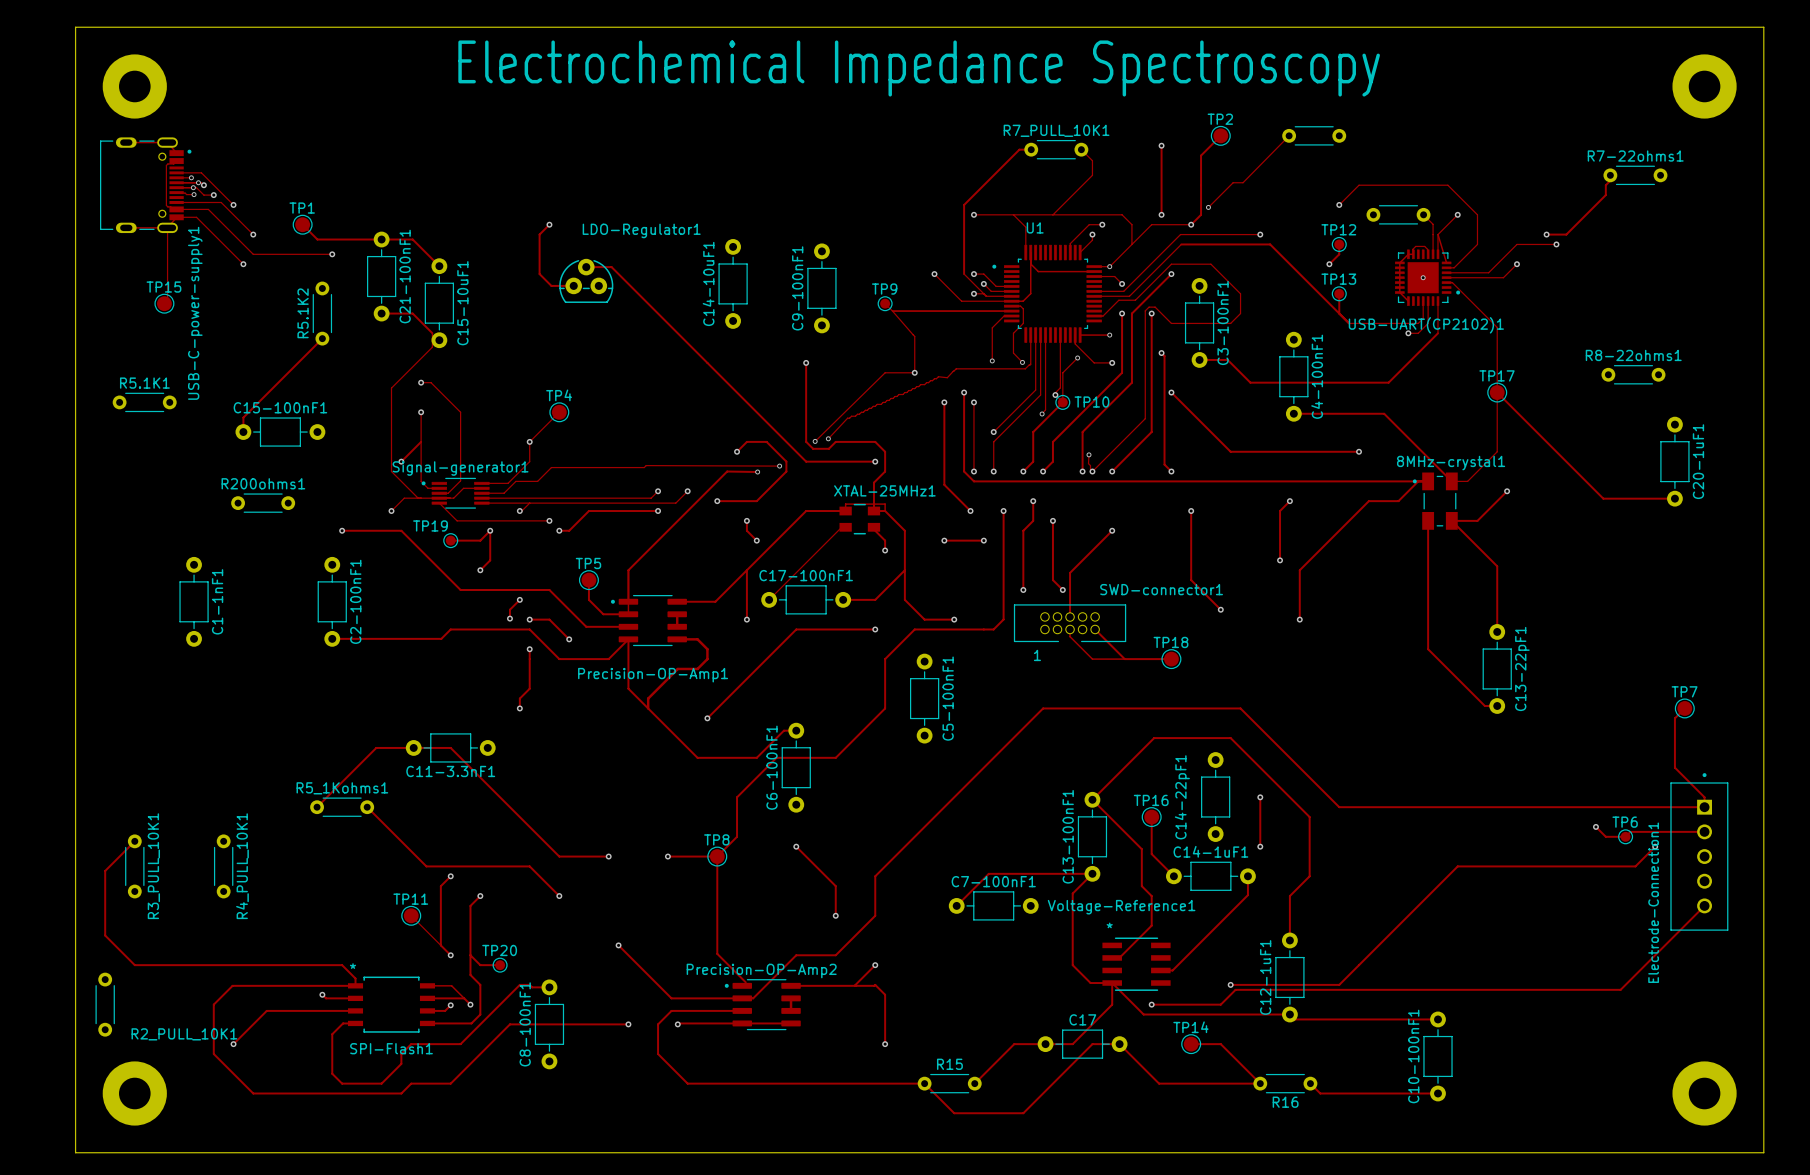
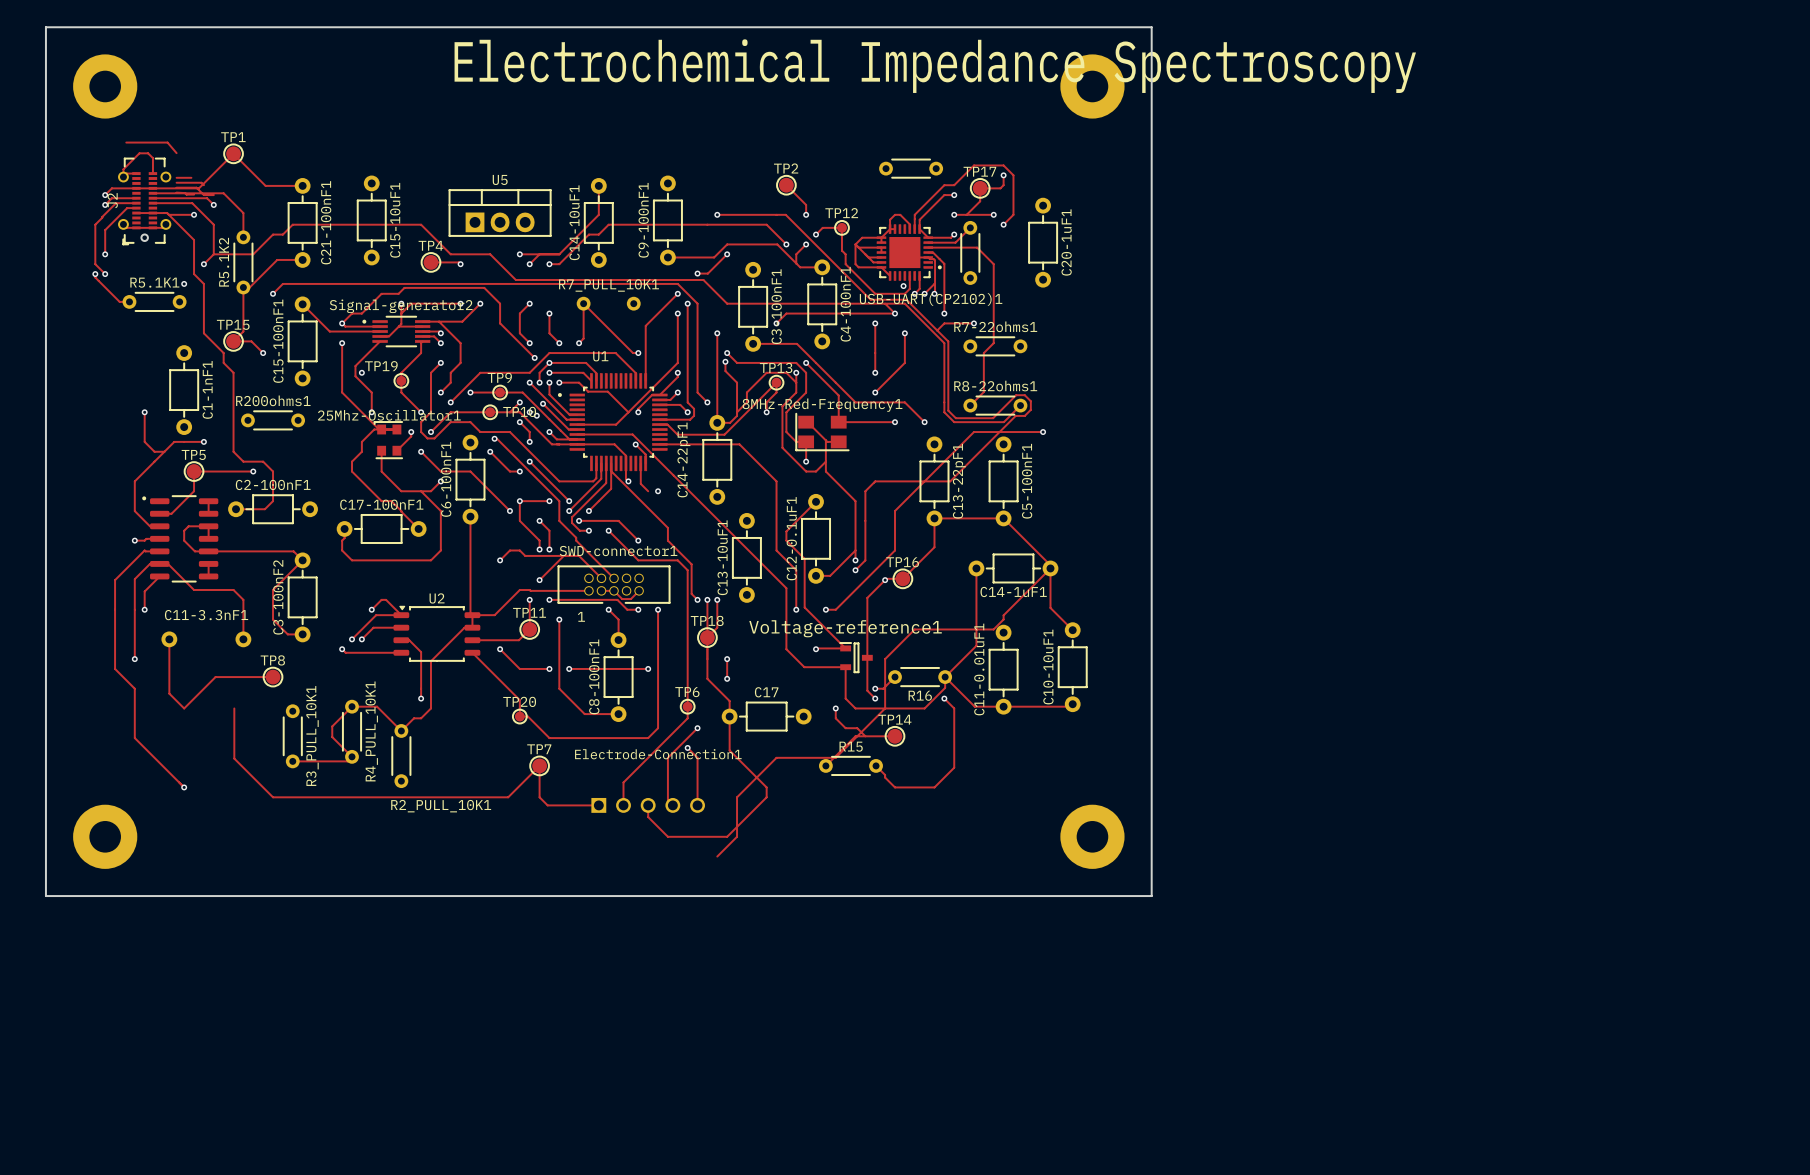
board edge: (75, 27) (75, 1152) (1763, 1152) (1763, 27) (1151, 27) -> (75, 27) (45, 27) (45, 896) (1151, 896) (1151, 27)
part position: (134, 86) -> (105, 86)
part: none -> (1092, 86)
part: (1704, 86) -> none
track: (1220, 135) (1201, 155) (1201, 214) (1191, 224) (1151, 224) (1109, 266) (1094, 266) -> none
TP2 position: (1220, 135) -> (786, 185)
track: (1289, 135) (1243, 182) (1233, 182) (1208, 207) -> none
part: (1314, 135) -> none
track: (1161, 145) (1161, 214) -> none
via: (1161, 145) -> none
track: (1031, 149) (1019, 149) (964, 204) (964, 274) (986, 296) (1011, 296) -> none
R7_PULL_10K1 side: top (1056, 149) -> bottom (608, 303)
track: (1081, 149) (1092, 160) (1092, 175) (1052, 214) -> none
track: (176, 161) (173, 163) (166, 165) (167, 206) (176, 209) (208, 209) (253, 254) (332, 254) -> none
part: none -> (911, 168)
track: (176, 172) (201, 172) (233, 204) -> none
track: none -> (152, 173) (152, 158) (148, 153) (139, 153) (123, 169) (123, 177) (126, 173) (136, 173)
track: none -> (1003, 175) (1003, 185) (1000, 188) (980, 188) (980, 201) (966, 214)
via: none -> (1003, 175)
track: (1610, 175) (1610, 180) (1605, 185) (1605, 195) (1566, 234) (1546, 234) -> none
R7-22ohms1 position: (1635, 175) -> (995, 346)
via: (191, 177) -> none
via: (198, 182) -> none
USB-C-power-supply1: (145, 185) -> none
via: (203, 185) -> none
track: none -> (302, 185) (265, 185) (233, 153) (198, 188) (111, 188) (105, 195)
track: none -> (598, 185) (598, 214) (559, 254) (519, 254)
track: none -> (786, 185) (806, 204) (806, 214)
via: (193, 187) -> none
track: none -> (152, 193) (223, 193) (243, 213) (243, 237)
via: (194, 194) -> none
via: none -> (105, 195)
via: (213, 195) -> none
track: none -> (954, 195) (944, 195) (919, 219) (919, 229) (928, 237) (951, 237) (954, 234)
via: none -> (954, 195)
track: none -> (136, 198) (111, 198) (105, 204)
track: none -> (152, 198) (207, 198) (213, 204)
J2: none -> (144, 201)
track: (176, 202) (221, 202) (253, 234) -> none
track: none -> (136, 203) (116, 203) (95, 224) (95, 264) (105, 274)
track: none -> (152, 203) (192, 203) (213, 224) (213, 254)
via: none -> (105, 204)
via: none -> (213, 204)
via: (233, 204) -> none
track: (1339, 204) (1359, 185) (1447, 185) (1477, 214) (1477, 244) (1454, 267) (1446, 267) -> none
via: (1339, 204) -> none
via: (1208, 207) -> none
track: none -> (136, 208) (127, 208) (105, 230) (105, 254)
track: none -> (136, 213) (167, 213) (194, 239) (194, 274) (203, 283) (203, 333) (223, 353) (223, 362) (233, 372) (233, 451) (243, 461) (263, 461) (273, 471) (273, 501) (264, 509) (236, 509)
U5: none -> (500, 213)
track: none -> (168, 214) (194, 214)
via: none -> (194, 214)
via: none -> (717, 214)
via: none -> (806, 214)
track: none -> (954, 214) (973, 214)
via: none -> (954, 214)
via: (973, 214) -> none
track: (993, 214) (1122, 214) (1131, 224) (1131, 244) -> none
via: none -> (993, 214)
track: (1013, 214) (1025, 227) (1025, 252) -> none
via: (1161, 214) -> none
part: (1398, 214) -> none
track: (1423, 214) (1433, 224) (1433, 254) -> none
track: (1457, 214) (1437, 234) -> none
via: (1457, 214) -> none
track: (302, 224) (317, 239) (412, 239) (439, 266) -> none
TP1 position: (302, 224) -> (233, 153)
track: (549, 224) (539, 234) (539, 274) (551, 285) (573, 285) -> none
via: (549, 224) -> none
track: none -> (1003, 224) (1013, 214) (1013, 175) (1003, 165) (973, 165) (954, 185) (944, 185) (914, 214) (914, 229)
via: none -> (1003, 224)
track: (1102, 224) (1089, 224) (1070, 243) (1070, 252) -> none
via: (1102, 224) -> none
via: (1191, 224) -> none
track: none -> (970, 227) (955, 242) (928, 242)
track: none -> (890, 229) (881, 237)
track: none -> (890, 229) (890, 219) (895, 214) (900, 214) (909, 224) (909, 229)
track: none -> (890, 229) (895, 229)
via: (253, 234) -> none
track: none -> (816, 234) (822, 227) (841, 227) (841, 250) (845, 254) (845, 264) (875, 293) (904, 293) (909, 288) (909, 275)
via: none -> (816, 234)
via: none -> (954, 234)
track: (1092, 234) (1092, 240) (1080, 252) -> none
via: (1092, 234) -> none
track: (1260, 234) (1180, 234) (1123, 291) (1094, 291) -> none
via: (1260, 234) -> none
track: (1437, 234) (1437, 254) -> none
track: (1437, 234) (1446, 262) -> none
via: (1546, 234) -> none
track: none -> (881, 237) (862, 237) (855, 244)
track: none -> (881, 237) (881, 242)
track: none -> (786, 244) (766, 224) (608, 224) (598, 234) (588, 234) (559, 264) (549, 264)
via: none -> (786, 244)
track: none -> (806, 244) (796, 254) (796, 263)
via: none -> (806, 244)
track: none -> (855, 244) (855, 264) (858, 267) (881, 267) (890, 275)
track: none -> (855, 244) (873, 262) (881, 262)
track: (1339, 244) (1339, 254) (1329, 264) -> none
TP12 position: (1339, 244) -> (841, 227)
track: (1556, 244) (1516, 244) (1488, 272) (1446, 272) -> none
via: (1556, 244) -> none
track: none -> (858, 247) (881, 247) (881, 252)
track: none -> (928, 247) (977, 247) (993, 264) (993, 343) (983, 353) (983, 392) (970, 405)
track: none -> (904, 252) (909, 257) (928, 257) (935, 260) (934, 293)
track: none -> (928, 252) (933, 252) (944, 263) (944, 313)
part: none -> (970, 252)
track: (1030, 252) (1030, 293) (1023, 301) (961, 301) (934, 274) -> none
via: none -> (105, 254)
track: none -> (213, 254) (253, 254) (273, 234) (282, 234) (292, 224) (421, 224) (450, 254) (490, 254) (515, 279) (703, 279) (727, 303) (904, 303) (944, 343) (944, 402)
track: none -> (213, 254) (203, 264)
via: (332, 254) -> none
via: none -> (519, 254)
track: none -> (539, 254) (529, 264)
track: none -> (727, 254) (707, 273) (697, 273)
via: none -> (727, 254)
track: (1428, 254) (1427, 249) (1424, 246) (1415, 246) (1412, 249) (1413, 254) (1408, 254) (1399, 262) (1399, 292) (1408, 301) -> none
track: none -> (667, 257) (714, 257) (727, 244) (777, 244) (800, 267) (822, 267)
track: none -> (868, 257) (881, 257)
track: none -> (302, 259) (277, 259) (249, 287) (243, 287) (243, 331) (233, 341) (251, 341) (263, 353)
track: none -> (430, 262) (458, 262) (460, 264)
track: (1030, 263) (1038, 271) (1094, 271) -> none
via: none -> (203, 264)
track: (243, 264) (196, 217) (176, 217) (167, 227) (167, 300) (164, 303) -> none
via: (243, 264) -> none
via: none -> (460, 264)
via: none -> (529, 264)
via: none -> (549, 264)
via: (1329, 264) -> none
track: (1516, 264) (1503, 277) (1446, 277) -> none
via: (1516, 264) -> none
via: (1109, 266) -> none
track: (586, 267) (611, 267) (806, 461) (875, 461) -> none
via: none -> (697, 273)
track: none -> (95, 274) (95, 277) (119, 301) (129, 301)
via: none -> (95, 274)
via: none -> (105, 274)
via: (934, 274) -> none
track: (973, 274) (983, 274) (996, 286) (1011, 286) -> none
via: (973, 274) -> none
track: (1171, 274) (1131, 313) (1131, 382) (1082, 432) (1082, 471) -> none
via: (1171, 274) -> none
track: none -> (919, 275) (919, 288) (914, 293)
C21-100nF1 position: (381, 276) -> (302, 222)
track: (1094, 276) (1114, 276) (1122, 283) -> none
via: (1423, 277) -> none
USB-UART(CP2102)1 position: (1427, 277) -> (909, 252)
LDO-Regulator1: (586, 280) -> none
track: (1446, 282) (1452, 282) (1497, 327) (1497, 451) (1467, 481) (1451, 481) (1384, 413) (1293, 413) -> none
via: none -> (184, 283)
C14-10uF1 position: (733, 283) -> (598, 222)
track: none -> (935, 283) (924, 293)
track: (983, 283) (991, 291) (1011, 291) -> none
via: (983, 283) -> none
via: (1122, 283) -> none
via: none -> (903, 286)
C9-100nF1 position: (821, 288) -> (667, 220)
track: none -> (273, 293) (282, 283) (677, 283) (697, 303) (697, 392) (707, 402)
via: none -> (273, 293)
track: none -> (677, 293) (645, 325) (645, 380)
via: none -> (677, 293)
via: none -> (914, 293)
via: none -> (924, 293)
via: none -> (934, 293)
track: (973, 293) (983, 293) -> none
via: (973, 293) -> none
U1 position: (1047, 293) -> (612, 422)
track: (1339, 293) (1339, 313) -> none
TP13 position: (1339, 293) -> (776, 382)
track: (1094, 296) (1129, 296) (1181, 244) (1270, 244) (1349, 323) (1418, 323) (1423, 318) (1423, 301) -> none
track: (1428, 301) (1428, 323) (1418, 333) (1408, 333) -> none
track: (1437, 301) (1437, 333) (1388, 382) (1250, 382) (1227, 359) (1199, 359) -> none
TP15 position: (164, 303) -> (233, 341)
track: none -> (401, 303) (401, 324) (388, 336) (380, 336)
via: none -> (401, 303)
C15-10uF1 position: (439, 303) -> (371, 220)
track: none -> (460, 303) (411, 303) (401, 313)
via: none -> (460, 303)
track: none -> (480, 303) (462, 321) (422, 321)
via: none -> (480, 303)
track: none -> (529, 303) (519, 313) (519, 333) (529, 343)
via: none -> (529, 303)
track: none -> (687, 303) (687, 402) (694, 408) (694, 415) (690, 419) (659, 419)
via: none -> (687, 303)
TP9 position: (885, 303) -> (500, 392)
track: none -> (302, 304) (329, 331) (380, 331)
track: (1011, 306) (1020, 306) (1023, 308) (1023, 323) (1013, 333) (1013, 353) (1022, 362) -> none
track: (892, 311) (914, 336) (914, 372) (885, 372) (815, 441) -> none
track: (892, 311) (1011, 311) (892, 311) -> none
R5.1K2 position: (322, 313) -> (243, 262)
track: (381, 313) (412, 313) (432, 333) (432, 347) (391, 388) (391, 471) (418, 498) -> none
track: none -> (549, 313) (549, 333) (559, 343)
via: none -> (549, 313)
track: none -> (677, 313) (677, 362) (616, 424) (577, 424)
via: none -> (677, 313)
track: none -> (895, 313) (786, 313) (776, 323)
via: none -> (895, 313)
via: none -> (944, 313)
track: (1122, 313) (1122, 372) (1052, 441) (1052, 461) (1043, 471) -> none
via: (1122, 313) -> none
track: (1151, 313) (1151, 432) (1112, 471) -> none
via: (1151, 313) -> none
track: (1011, 316) (1004, 316) (992, 327) (992, 360) -> none
track: (1094, 316) (1103, 316) (1118, 300) (1135, 300) (1171, 264) (1210, 264) (1240, 293) (1240, 313) (1230, 323) (1171, 323) (1155, 307) (1149, 307) (1145, 310) (1145, 418) (1092, 471) (1088, 463) (1089, 454) -> none
track: none -> (439, 321) (460, 343) (460, 362) (450, 372) (450, 382) (440, 392)
C3-100nF1 position: (1199, 322) -> (753, 306)
via: none -> (342, 323)
track: none -> (500, 323) (500, 303) (484, 287) (404, 287) (398, 293) (381, 293) (361, 313) (352, 313) (342, 323) (345, 326) (380, 326)
track: none -> (500, 323) (534, 357)
via: none -> (776, 323)
track: none -> (875, 323) (875, 372)
via: none -> (875, 323)
track: none -> (973, 323) (944, 323) (937, 330)
via: none -> (973, 323)
USB-UART(CP2102)1 name position: USB-UART(CP2102)1 (1426, 325) -> USB-UART(CP2102)1 (931, 299)
track: none -> (398, 326) (422, 326)
Signal-generator2: none -> (396, 331)
track: none -> (422, 331) (439, 331) (440, 333)
via: none -> (440, 333)
track: none -> (717, 333) (717, 422) (730, 422) (737, 415) (737, 382) (725, 371) (725, 361)
via: none -> (717, 333)
track: none -> (904, 333) (904, 362) (875, 392)
via: none -> (904, 333)
via: (1408, 333) -> none
track: (1030, 335) (1030, 364) (1025, 368) (956, 368) (947, 377) (938, 376) (885, 402) -> (924, 422) (904, 402) (885, 402)
track: (1035, 335) (1035, 390) (993, 432) -> none
track: (1040, 335) (1040, 395) (993, 441) (993, 471) -> none
track: (1045, 335) (1045, 409) (1042, 413) -> none
track: (1060, 335) (1060, 387) (1055, 395) (1062, 402) -> none
track: (1075, 335) (1075, 343) (1094, 362) (1112, 362) -> none
track: (1080, 335) (1109, 335) -> none
via: (1109, 335) -> none
track: none -> (422, 336) (434, 336) (440, 343)
track: (322, 338) (243, 417) (243, 432) -> none
track: none -> (380, 341) (355, 366) (355, 376) (371, 392) (371, 412)
track: none -> (422, 341) (421, 353) (401, 372) (401, 392) (421, 412)
track: none -> (342, 343) (342, 392) (379, 429)
via: none -> (342, 343)
via: none -> (440, 343)
via: none -> (529, 343)
via: none -> (559, 343)
track: none -> (579, 343) (583, 338) (583, 303) (632, 353) (638, 353)
via: none -> (579, 343)
via: none -> (263, 353)
via: none -> (638, 353)
via: none -> (727, 353)
track: (1161, 353) (1164, 356) (1164, 464) (1171, 471) -> none
via: (1161, 353) -> none
via: none -> (534, 357)
track: (1077, 357) (1062, 372) (1062, 402) -> none
via: (1077, 357) -> none
via: (992, 360) -> none
via: none -> (725, 361)
via: none -> (440, 362)
via: none -> (549, 362)
track: (806, 362) (806, 372) -> (727, 353) (737, 362) (796, 362) (806, 372)
track: none -> (806, 362) (838, 395) (838, 422) (895, 422)
via: (1022, 362) -> none
via: (1112, 362) -> none
via: none -> (361, 372)
track: none -> (549, 372) (583, 372) (591, 380)
via: none -> (549, 372)
track: none -> (677, 372) (677, 377) (659, 395) (652, 395)
via: none -> (677, 372)
track: none -> (796, 372) (796, 392) (782, 406) (782, 447) (806, 471) (816, 471) (825, 461)
via: none -> (796, 372)
via: none -> (875, 372)
via: (914, 372) -> none
R8-22ohms1 position: (1633, 374) -> (995, 405)
C4-100nF1 position: (1293, 376) -> (822, 304)
track: none -> (596, 380) (596, 373) (586, 362) (549, 362) (539, 372) (539, 382)
track: none -> (635, 380) (635, 373) (615, 353) (549, 353) (529, 372) (480, 372) (450, 402)
track: (421, 382) (430, 382) (460, 412) (460, 480) (448, 493) (439, 493) -> none
via: (421, 382) -> none
track: none -> (529, 382) (566, 419) (577, 419)
via: none -> (529, 382)
via: none -> (539, 382)
track: none -> (549, 382) (549, 394) (569, 414) (577, 414)
via: none -> (549, 382)
track: none -> (559, 382) (579, 382) (588, 391) (607, 391) (628, 412)
via: none -> (559, 382)
track: none -> (796, 382) (786, 372) (766, 372) (746, 392) (746, 402) (737, 412)
via: none -> (440, 392)
track: none -> (470, 392) (522, 392) (569, 439)
via: none -> (470, 392)
track: none -> (677, 392) (670, 399) (659, 399)
via: none -> (677, 392)
track: (806, 392) (806, 441) (813, 448) (828, 448) (835, 441) -> (806, 422) (827, 441) (835, 441)
track: none -> (806, 392) (786, 412) (786, 432) (796, 441) (806, 441) (806, 461)
via: none -> (875, 392)
track: (964, 392) (964, 471) (973, 481) (1428, 481) -> none
via: (964, 392) -> none
track: (1171, 392) (1230, 451) (1359, 451) -> none
via: (1171, 392) -> none
track: (1497, 392) (1603, 498) (1674, 498) -> none
TP17 position: (1497, 392) -> (980, 188)
track: none -> (652, 395) (638, 408) (638, 412)
via: (1055, 395) -> none
R5.1K1 position: (144, 402) -> (154, 301)
via: none -> (450, 402)
track: none -> (519, 402) (509, 412)
via: none -> (519, 402)
via: none -> (707, 402)
track: (883, 402) (847, 418) (828, 438) -> (883, 402) (855, 402) (796, 343) (753, 343)
via: (944, 402) -> none
track: (973, 402) (973, 471) -> none
via: (973, 402) -> none
track: (1062, 402) (1033, 432) (1033, 461) (1023, 471) -> none
TP10 position: (1062, 402) -> (490, 412)
track: none -> (543, 403) (568, 429) (577, 429)
via: none -> (543, 403)
track: none -> (659, 404) (680, 404) (687, 412)
C15-100nF1 name position: C15-100nF1 (280, 407) -> C15-100nF1 (278, 341)
track: none -> (144, 412) (144, 441) (154, 451) (164, 451)
via: none -> (144, 412)
via: none -> (371, 412)
track: (421, 412) (421, 422) -> (440, 362) (430, 372) (430, 412) (421, 422)
via: none -> (529, 412)
track: (559, 412) (529, 441) (529, 461) (507, 483) (481, 483) -> none
TP4 position: (559, 412) -> (430, 262)
via: none -> (638, 412)
via: none -> (687, 412)
track: none -> (766, 412) (766, 402) (776, 392) (776, 382) (724, 434) (677, 434) (667, 424) (659, 424)
via: none -> (766, 412)
track: (944, 412) (944, 484) (970, 511) -> (944, 412) (954, 422) (1003, 422) (1020, 405)
via: (1042, 413) -> none
via: none -> (536, 415)
track: none -> (519, 422) (529, 432) (529, 441)
via: none -> (519, 422)
via: none -> (895, 422)
via: none -> (924, 422)
track: none -> (396, 429) (374, 429) (361, 441) (361, 451) (352, 461) (352, 471) (381, 501) (391, 501) (418, 528)
C15-100nF1 rotation: 0° (280, 432) -> 90° clockwise (302, 341)
C15-100nF1 position: (280, 432) -> (302, 341)
track: none -> (411, 432) (411, 436) (396, 450)
via: none -> (411, 432)
track: (421, 432) (421, 481) (428, 488) (439, 488) -> (421, 432) (427, 438) (434, 438) (450, 422) (470, 422) (480, 432) (509, 432) (559, 481) (593, 481) (596, 478) (596, 463)
track: none -> (430, 432) (450, 412) (519, 412) (551, 444) (614, 444) (625, 455) (625, 478) (628, 481)
via: none -> (430, 432)
track: none -> (549, 432) (556, 439) (577, 439)
via: none -> (549, 432)
8MHz-Red-Frequency1: none -> (822, 432)
via: (993, 432) -> none
track: none -> (1043, 432) (973, 432) (895, 511) (895, 550) (835, 609) (825, 609)
via: none -> (1043, 432)
track: none -> (577, 434) (632, 434) (786, 588) (786, 649) (804, 667) (845, 667) (845, 698) (855, 708) (924, 708) (945, 687) (945, 677)
track: none -> (494, 438) (496, 438) (559, 501) (559, 520) (614, 578)
via: none -> (494, 438)
via: (828, 438) -> none
25Mhz-Oscillator1: none -> (388, 440)
track: none -> (825, 440) (825, 471) (855, 501) (855, 560)
track: none -> (203, 441) (174, 441) (134, 481) (134, 511) (150, 526) (159, 526)
via: none -> (203, 441)
track: (421, 441) (401, 461) -> none
via: (815, 441) -> none
track: (838, 441) (875, 441) (885, 451) (885, 471) (875, 481) -> (717, 214) (785, 214) (870, 299) (906, 299) (948, 341) (948, 410) (955, 418) (993, 418) (1016, 395) (1024, 395) (1030, 401) (1030, 409) (1024, 415) (1015, 415) (950, 481) (875, 481)
track: none -> (635, 444) (645, 454) (645, 463)
via: none -> (635, 444)
track: none -> (659, 444) (739, 444) (776, 481) (776, 550) (796, 570) (796, 609)
track: none -> (381, 450) (381, 471) (401, 491) (430, 491) (440, 481)
track: none -> (421, 451) (440, 471) (470, 471) (509, 511)
via: none -> (421, 451)
track: none -> (490, 451) (509, 471) (519, 471)
via: none -> (490, 451)
track: (737, 451) (746, 441) (766, 441) (786, 461) (786, 471) (756, 501) (717, 501) -> none
via: (737, 451) -> none
via: (1359, 451) -> none
via: (1089, 454) -> none
via: (401, 461) -> none
track: none -> (529, 461) (569, 501)
via: none -> (529, 461)
via: none -> (806, 461)
via: (875, 461) -> none
C20-1uF1 position: (1674, 461) -> (1043, 242)
track: none -> (601, 463) (601, 478) (569, 511)
track: none -> (606, 463) (606, 483) (571, 517) (571, 522) (579, 530) (588, 530)
track: none -> (611, 463) (611, 488) (588, 511)
track: none -> (640, 463) (640, 483) (648, 491)
track: (779, 466) (551, 467) (537, 481) (515, 481) (504, 493) (481, 493) -> none
via: (779, 466) -> none
track: none -> (253, 471) (194, 471) (194, 491) (171, 513) (159, 513)
via: none -> (253, 471)
via: none -> (519, 471)
track: none -> (611, 471) (667, 527) (667, 540) (691, 564) (691, 593) (697, 599)
via: (973, 471) -> none
via: (993, 471) -> none
via: (1023, 471) -> none
via: (1043, 471) -> none
via: (1082, 471) -> none
via: (1092, 471) -> none
via: (1112, 471) -> none
via: (1171, 471) -> none
track: (757, 472) (727, 471) (628, 570) -> none
via: (757, 472) -> none
via: none -> (440, 481)
via: none -> (628, 481)
track: (1418, 481) (1398, 501) (1368, 501) (1299, 570) (1299, 619) -> none
track: (873, 482) (873, 511) (885, 511) -> (873, 482) (865, 491) (865, 560) (855, 570)
track: (481, 488) (463, 488) (453, 498) (404, 498) (391, 511) -> none
track: none -> (421, 491) (440, 511) (440, 550) (430, 560) (352, 560) (342, 550) (344, 528)
track: (658, 491) (651, 498) (481, 498) -> none
track: (687, 491) (675, 503) (481, 503) -> none
via: (687, 491) -> none
track: (1507, 491) (1477, 520) (1451, 520) (1497, 566) (1497, 631) -> none
via: (1507, 491) -> none
Signal-generator1: (455, 493) -> none
track: none -> (208, 501) (208, 513)
via: none -> (519, 501)
track: none -> (549, 501) (519, 501) (519, 520) (539, 540) (539, 549)
via: none -> (549, 501)
via: none -> (569, 501)
via: (717, 501) -> none
track: none -> (816, 501) (786, 531) (786, 540) (804, 558) (804, 607) (845, 648) (816, 649)
track: (1033, 501) (1033, 520) (1023, 530) (1023, 589) -> none
via: (1033, 501) -> none
track: (1289, 501) (1280, 511) (1280, 560) -> none
via: (1289, 501) -> none
8MHz-crystal1: (1435, 501) -> none
R200ohms1 position: (263, 503) -> (273, 420)
track: (439, 503) (457, 520) (549, 520) -> none
track: (529, 503) (519, 511) -> none
via: (391, 511) -> none
via: none -> (509, 511)
via: (519, 511) -> none
via: none -> (569, 511)
via: none -> (588, 511)
track: (658, 511) (588, 511) (569, 530) (559, 530) -> none
via: (658, 511) -> none
track: (885, 511) (904, 530) (904, 599) (924, 619) (954, 619) -> none
track: (885, 511) (885, 504) (845, 504) (845, 511) (806, 511) (715, 601) (677, 601) -> none
via: (970, 511) -> none
track: (1003, 511) (1003, 615) -> (1050, 568) (1003, 615)
via: (1003, 511) -> none
track: (1191, 511) (1191, 580) (1220, 609) -> none
via: (1191, 511) -> none
track: none -> (470, 516) (470, 613) (472, 615)
XTAL-25MHz1: (859, 519) -> none
track: none -> (539, 520) (549, 530) (549, 549)
via: none -> (539, 520)
via: (549, 520) -> none
track: none -> (579, 520) (618, 520) (638, 540)
via: none -> (579, 520)
track: (746, 520) (746, 530) (756, 540) -> none
via: (746, 520) -> none
track: (1052, 520) (1052, 580) (1062, 589) -> none
via: (1052, 520) -> none
track: (1428, 520) (1428, 649) (1484, 705) (1497, 705) -> none
track: (845, 527) (841, 527) (769, 599) -> none
track: (873, 527) (885, 540) (885, 550) -> none
track: (342, 530) (401, 530) (460, 589) (519, 589) -> (472, 615) (494, 615) (519, 589)
via: (342, 530) -> none
via: (490, 530) -> none
via: (559, 530) -> none
via: none -> (588, 530)
track: none -> (608, 530) (638, 560) (677, 560) (687, 570) (687, 718) (623, 782) (623, 805)
via: none -> (608, 530)
track: (1112, 530) (1070, 572) (1070, 617) -> none
via: (1112, 530) -> none
track: none -> (159, 538) (134, 540)
part: none -> (180, 538)
track: none -> (208, 538) (208, 526) (188, 526) (184, 530) (184, 540) (194, 551) (293, 551) (302, 560) (273, 589) (273, 619) (287, 634) (302, 634)
C12-0.1uF1: none -> (816, 538)
via: none -> (134, 540)
track: (450, 540) (480, 540) (490, 530) (490, 560) (480, 570) -> none
TP19 position: (450, 540) -> (401, 380)
via: none -> (638, 540)
via: (756, 540) -> none
track: (944, 540) (983, 540) -> none
via: (944, 540) -> none
via: (983, 540) -> none
via: none -> (539, 549)
via: none -> (549, 549)
track: none -> (855, 550) (830, 575) (816, 575)
via: (885, 550) -> none
track: none -> (159, 551) (144, 550) (115, 580) (115, 668) (134, 688) (134, 738) (184, 787)
track: none -> (563, 555) (539, 580)
C13-10uF1: none -> (746, 557)
track: none -> (500, 560) (509, 550) (519, 550) (525, 555) (579, 555) (601, 578)
via: none -> (500, 560)
via: none -> (855, 560)
via: (1280, 560) -> none
track: none -> (208, 563) (208, 576)
track: none -> (976, 568) (976, 645) (945, 677)
via: (480, 570) -> none
track: (628, 570) (628, 601) -> none
track: (628, 570) (628, 614) (603, 614) (588, 599) (588, 580) -> none
track: (746, 570) (746, 619) -> none
via: none -> (855, 570)
track: (904, 570) (875, 599) (843, 599) -> none
track: none -> (159, 576) (144, 591) (144, 609)
via: none -> (539, 580)
TP5 position: (588, 580) -> (194, 471)
via: none -> (885, 580)
track: (529, 589) (549, 589) (586, 626) (628, 626) -> (529, 589) (588, 590)
via: (1023, 589) -> none
via: (1062, 589) -> none
SWD-connector1 name position: SWD-connector1 (1161, 589) -> SWD-connector1 (618, 551)
track: none -> (601, 590) (614, 590) (622, 599) (630, 599) (639, 590)
C3-100nF2: none -> (302, 597)
track: (519, 599) (509, 609) (509, 618) -> none
via: (519, 599) -> none
track: none -> (529, 599) (529, 629) (518, 640) (472, 640)
via: none -> (529, 599)
track: none -> (549, 599) (617, 599) (627, 609) (638, 609)
via: none -> (549, 599)
via: none -> (697, 599)
via: none -> (707, 599)
track: none -> (717, 599) (717, 627) (707, 637)
via: none -> (717, 599)
C17-100nF1 position: (806, 599) -> (381, 528)
C1-1nF1 position: (194, 601) -> (184, 390)
C2-100nF1 rotation: 0° (332, 601) -> 90° clockwise (273, 509)
C2-100nF1 position: (332, 601) -> (273, 509)
C2-100nF1 name position: C2-100nF1 (355, 601) -> C2-100nF1 (273, 484)
via: none -> (144, 609)
track: none -> (371, 609) (381, 599) (386, 599) (401, 615) (376, 615) (352, 639)
via: none -> (371, 609)
track: none -> (608, 609) (618, 619) (618, 640)
via: none -> (608, 609)
via: none -> (638, 609)
track: none -> (658, 609) (658, 728) (648, 738) (549, 738) (527, 716) (519, 716) (519, 708)
via: none -> (658, 609)
via: none -> (796, 609)
via: none -> (825, 609)
via: (1220, 609) -> none
track: (677, 614) (677, 626) -> none
track: none -> (472, 615) (472, 627) (464, 627) (430, 661) (430, 708) (421, 718) (414, 718) (401, 730) (377, 706) (352, 706) (332, 726) (332, 737) (352, 756) (347, 761) (292, 761)
via: (509, 618) -> none
track: (529, 619) (549, 619) (569, 639) -> none
via: (529, 619) -> none
track: none -> (559, 619) (559, 688) (584, 714) (618, 714)
via: none -> (559, 619)
via: (746, 619) -> none
via: (954, 619) -> none
via: (1299, 619) -> none
Precision-OP-Amp1: (648, 620) -> none
SWD-connector1 position: (1070, 623) -> (614, 584)
track: none -> (401, 627) (373, 627) (361, 639)
track: (875, 629) (796, 629) (707, 718) -> none
via: (875, 629) -> none
track: (1070, 629) (1070, 636) (1092, 659) (1124, 659) -> none
track: (1095, 629) (1124, 659) -> none
track: none -> (1072, 630) (1050, 607) (1050, 565) (1003, 518) (934, 518) (934, 547) (902, 578) (886, 578) (867, 597) (867, 690) (875, 698)
U2: none -> (436, 633)
track: (332, 638) (441, 638) (450, 629) (529, 629) (559, 659) (608, 659) (628, 639) (628, 688) (687, 747) -> none
track: none -> (169, 639) (169, 693) (184, 708) (215, 677) (273, 677)
track: none -> (243, 639) (243, 599) (233, 589) (194, 589) (167, 563) (150, 563) (134, 579) (134, 659)
via: none -> (352, 639)
via: none -> (361, 639)
via: (569, 639) -> none
track: (677, 639) (697, 639) (707, 649) -> (707, 599) (707, 649)
track: none -> (401, 640) (409, 640) (421, 652) (421, 698)
track: none -> (342, 649) (345, 652) (401, 652)
via: none -> (342, 649)
track: none -> (500, 649) (519, 668) (549, 668)
via: none -> (500, 649)
track: (529, 649) (529, 688) (519, 700) -> (472, 652) (519, 700)
via: (529, 649) -> none
via: none -> (816, 649)
Voltage-reference1: none -> (856, 657)
via: none -> (134, 659)
track: (707, 659) (697, 668) (677, 668) (648, 698) (648, 708) -> (707, 659) (707, 678) (729, 701) (729, 750) (766, 787) (766, 797) (727, 836) (667, 836) (648, 817) (648, 805)
track: none -> (727, 659) (727, 678)
via: none -> (727, 659)
track: (1124, 659) (1171, 659) -> none
TP18 position: (1171, 659) -> (707, 637)
C10-10uF1: none -> (1072, 667)
via: none -> (549, 668)
track: none -> (569, 668) (648, 668)
via: none -> (569, 668)
via: none -> (648, 668)
C13-22pF1 position: (1497, 668) -> (934, 481)
C11-0.01uF1: none -> (1003, 669)
track: none -> (895, 677) (883, 688) (875, 688)
track: none -> (945, 677) (974, 706) (1070, 706) (1072, 704)
via: none -> (727, 678)
via: none -> (875, 688)
via: none -> (421, 698)
via: none -> (875, 698)
C5-100nF1 position: (924, 698) -> (1003, 481)
track: none -> (944, 698) (954, 708) (954, 767) (934, 787) (895, 787) (876, 765)
via: none -> (944, 698)
track: none -> (234, 708) (234, 758) (273, 797) (508, 797) (539, 765) (539, 797) (547, 805) (598, 805)
via: (519, 708) -> none
track: none -> (835, 708) (835, 718) (845, 728) (857, 728) (865, 736)
via: none -> (835, 708)
track: (1684, 708) (1674, 718) (1674, 767) (1704, 797) (1704, 807) (1339, 807) (1240, 708) (1043, 708) (875, 876) (875, 915) (835, 955) (796, 955) (753, 998) (671, 998) (618, 945) -> none
TP7 position: (1684, 708) -> (539, 765)
via position: (707, 718) -> (697, 728)
track: none -> (697, 728) (667, 757) (667, 800) (672, 805)
track: (796, 730) (783, 730) (756, 757) (697, 757) -> (697, 805) (697, 757)
track: none -> (895, 736) (855, 736) (825, 765)
C11-3.3nF1 side: top (450, 747) -> bottom (206, 639)
via: none -> (687, 747)
C6-100nF1 position: (796, 767) -> (470, 479)
via: none -> (184, 787)
C14-22pF1 position: (1215, 797) -> (717, 459)
track: (1260, 797) (1260, 846) -> none
via: (1260, 797) -> none
track: (317, 807) (376, 747) (450, 747) (559, 856) (608, 856) -> none
R5_1Kohms1: (342, 807) -> none
track: (367, 807) (426, 866) (529, 866) (559, 896) -> none
track: (1151, 817) (1151, 854) (1173, 876) -> none
TP16 position: (1151, 817) -> (902, 578)
track: (1595, 826) (1605, 836) (1625, 836) (1630, 831) (1704, 831) -> none
via: (1595, 826) -> none
part: none -> (105, 836)
C13-100nF1: (1092, 836) -> none
part: none -> (1092, 836)
TP6 position: (1625, 836) -> (687, 706)
track: (134, 841) (105, 870) (105, 935) (134, 965) (342, 965) (355, 978) (355, 985) (232, 985) (213, 1004) (213, 1054) (253, 1093) (401, 1093) (411, 1083) (450, 1083) (509, 1024) (628, 1024) -> none
track: (796, 846) (835, 886) (835, 915) -> none
via: (796, 846) -> none
via: (1260, 846) -> none
track: (1655, 846) (1635, 866) (1457, 866) (1339, 984) (1230, 984) -> none
via: (1655, 846) -> none
C14-1uF1 name position: C14-1uF1 (1210, 851) -> C14-1uF1 (1013, 591)
Electrode-Connection1 side: top (1699, 851) -> bottom (648, 805)
via: (608, 856) -> none
track: (667, 856) (717, 856) (717, 953) (745, 982) -> none
via: (667, 856) -> none
TP8 position: (717, 856) -> (273, 677)
R3_PULL_10K1 position: (134, 866) -> (292, 736)
R4_PULL_10K1 position: (223, 866) -> (352, 731)
track: (450, 876) (440, 886) (440, 945) -> none
via: (450, 876) -> none
C14-1uF1 position: (1210, 876) -> (1013, 568)
track: (1247, 876) (1247, 895) (1172, 970) (1160, 970) -> none
track: (480, 896) (470, 905) (470, 975) (480, 984) (480, 1014) (471, 1023) (427, 1023) -> none
via: (480, 896) -> none
via: (559, 896) -> none
track: (956, 905) (988, 873) (1092, 873) (1072, 893) (1072, 965) (1090, 983) (1112, 983) -> none
C7-100nF1: (993, 905) -> none
track: (1704, 905) (1620, 989) (1235, 989) (1220, 1004) (1151, 1004) -> none
track: (411, 915) (440, 945) -> none
TP11 position: (411, 915) -> (529, 629)
via: (835, 915) -> none
track: (1289, 940) (1289, 896) (1309, 876) (1309, 817) (1230, 738) (1154, 738) (1092, 799) (1141, 849) (1141, 886) (1151, 896) (1151, 925) (1119, 957) (1112, 957) -> none
track: (440, 945) (450, 955) -> none
via: (618, 945) -> none
via: (450, 955) -> none
track: (470, 955) (480, 965) (500, 965) -> none
Voltage-Reference1: (1136, 964) -> none
TP20 position: (500, 965) -> (519, 716)
track: (875, 965) (855, 985) -> none
via: (875, 965) -> none
C12-1uF1: (1289, 977) -> none
track: (1112, 983) (1112, 1004) (1072, 1044) (1014, 1044) (974, 1083) -> none
track: (1112, 983) (1143, 1014) (1289, 1014) (1294, 1019) (1437, 1019) -> none
via: (1230, 984) -> none
track: (427, 985) (451, 985) (464, 998) -> none
track: (791, 985) (875, 984) (885, 994) (885, 1044) -> none
track: (549, 987) (519, 984) (460, 1044) (411, 1044) (401, 1054) (401, 1063) (381, 1083) (342, 1083) (332, 1073) (332, 1034) (343, 1023) (355, 1023) -> none
track: (322, 994) (325, 998) (355, 998) -> none
via: (322, 994) -> none
track: (427, 998) (464, 998) -> none
track: (464, 998) (470, 1004) -> none
track: (791, 998) (791, 1010) -> none
R2_PULL_10K1 position: (105, 1004) -> (401, 756)
SPI-Flash1: (391, 1004) -> none
via: (470, 1004) -> none
Precision-OP-Amp2: (762, 1004) -> none
via: (1151, 1004) -> none
track: (450, 1005) (445, 1010) (427, 1010) -> none
via: (450, 1005) -> none
track: (355, 1010) (266, 1010) (233, 1044) -> none
track: (742, 1010) (671, 1010) (658, 1024) (658, 1054) (687, 1083) (924, 1083) (954, 1113) (1023, 1113) (1092, 1044) (1119, 1044) (1159, 1083) (1260, 1083) (1220, 1044) (1191, 1044) -> none
track: (678, 1023) (791, 1023) -> none
C8-100nF1 position: (549, 1024) -> (618, 677)
via: (628, 1024) -> none
via: (677, 1024) -> none
R2_PULL_10K1 name position: R2_PULL_10K1 (184, 1034) -> R2_PULL_10K1 (441, 806)
via: (233, 1044) -> none
via: (885, 1044) -> none
C17 position: (1082, 1044) -> (766, 716)
TP14 position: (1191, 1044) -> (895, 736)
C10-100nF1: (1437, 1056) -> none
R15 position: (949, 1083) -> (850, 765)
R16 position: (1285, 1083) -> (920, 677)
track: (1310, 1083) (1320, 1093) (1437, 1093) -> none
part: (134, 1093) -> none
part: (1704, 1093) -> none

